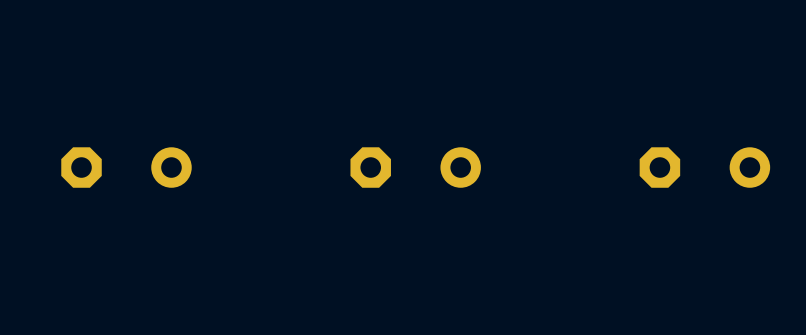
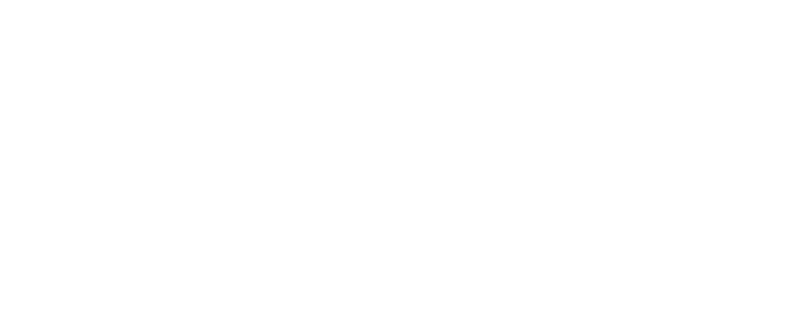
part: (126, 167) -> none
part: (415, 167) -> none
part: (704, 167) -> none

